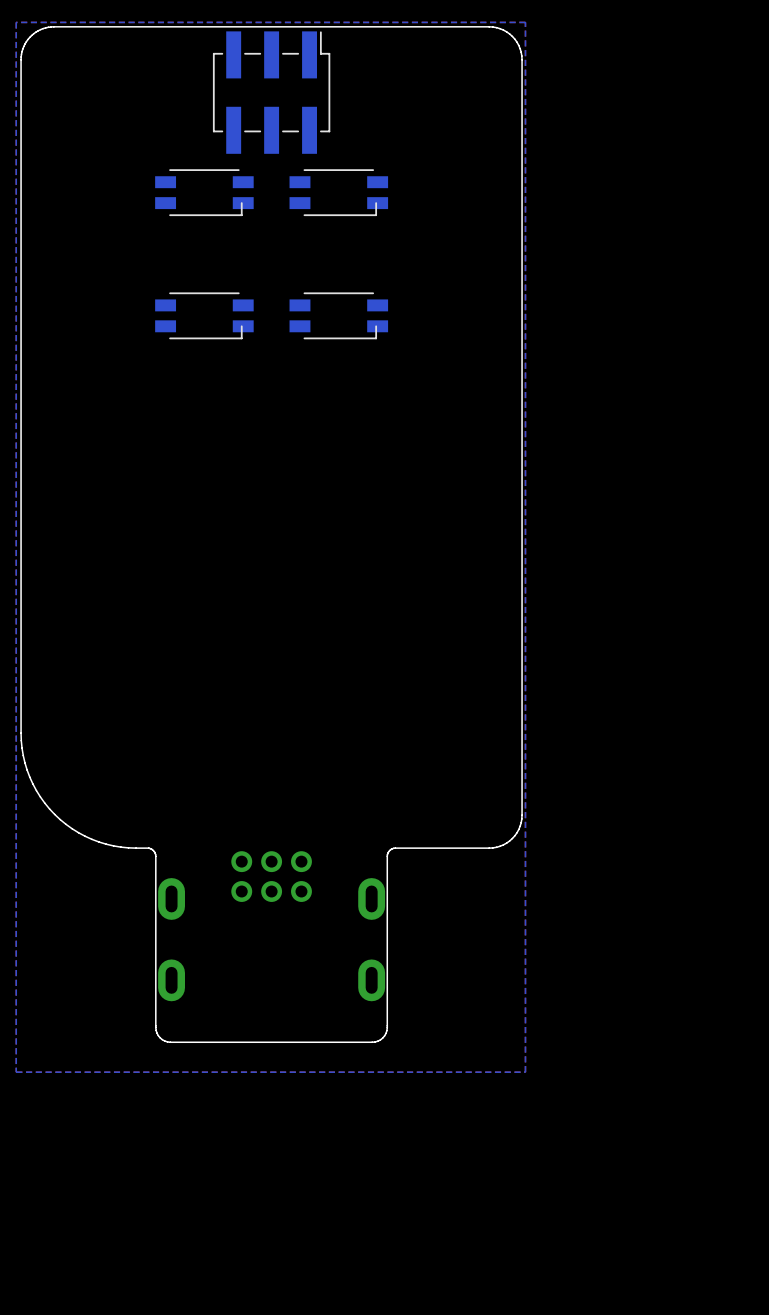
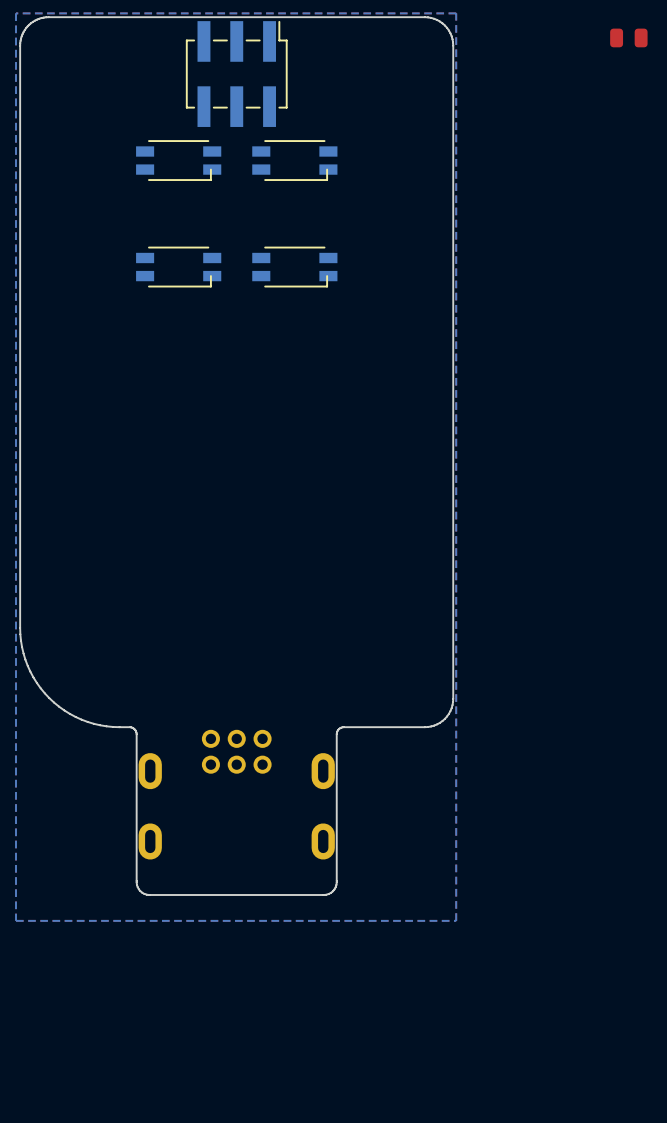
part: none -> (628, 37)

